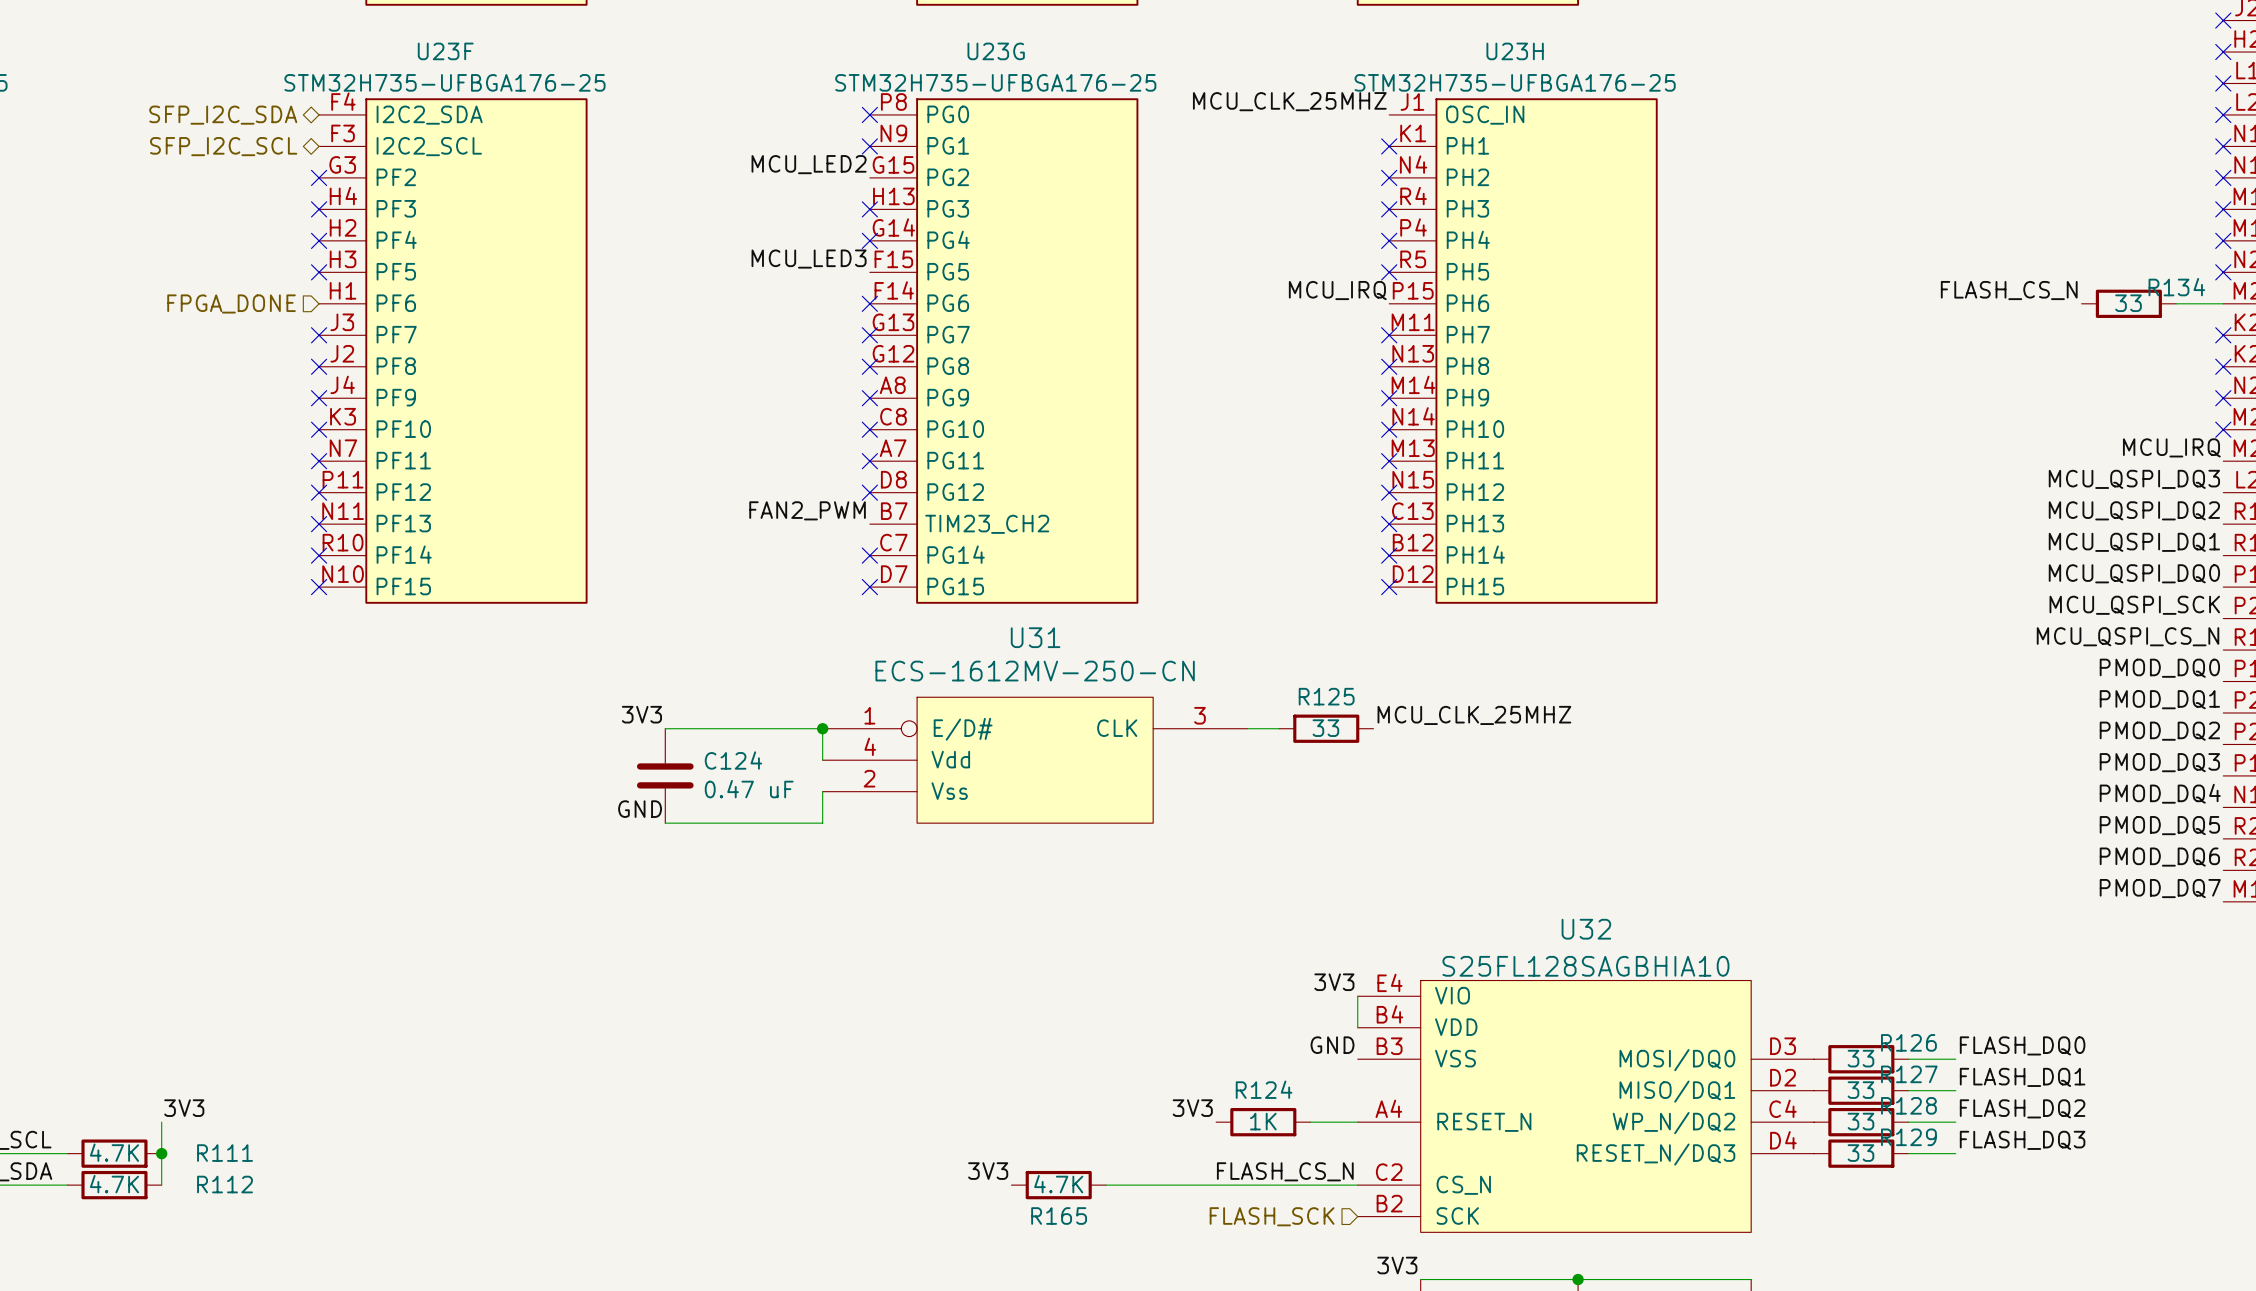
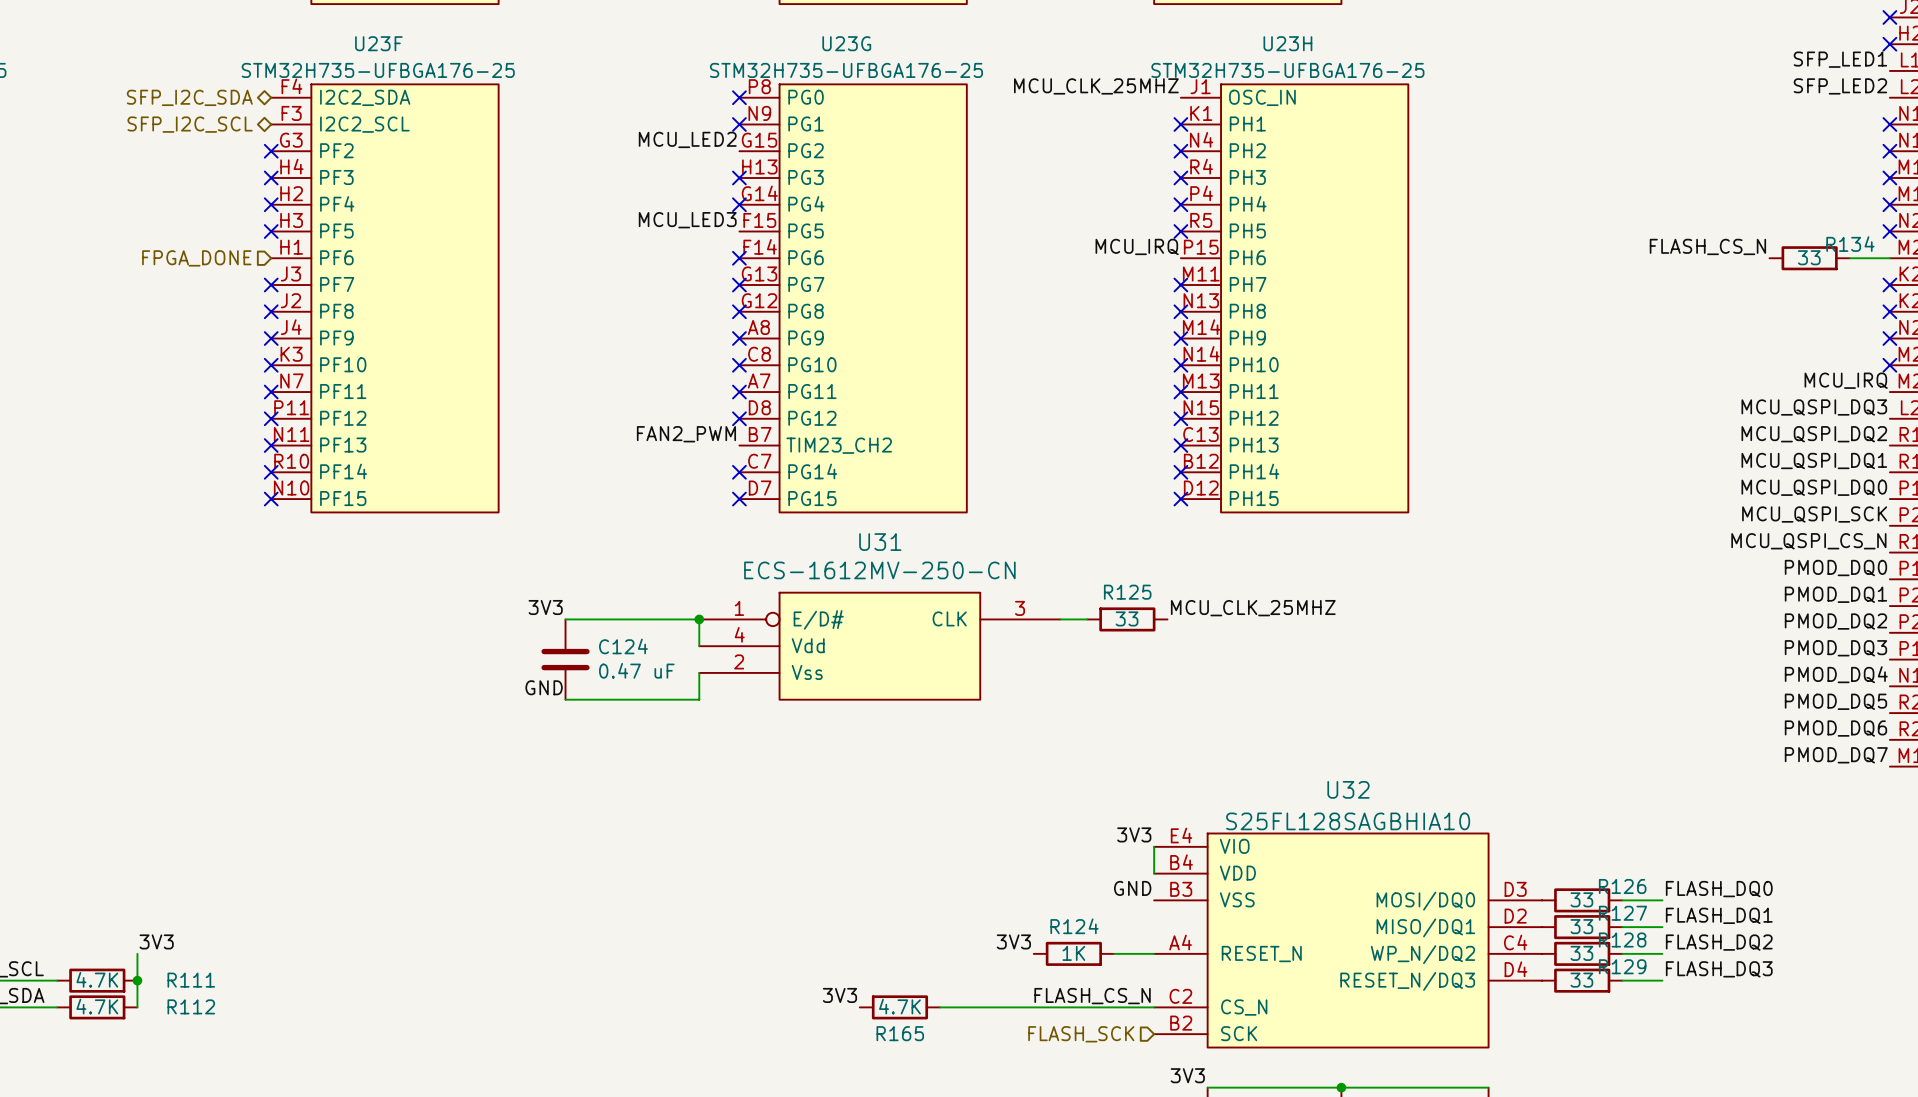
label: none -> SFP_LED1 (1840, 59)
no-connect mark: (2223, 83) -> none
label: none -> SFP_LED2 (1840, 86)
no-connect mark: (2223, 114) -> none

